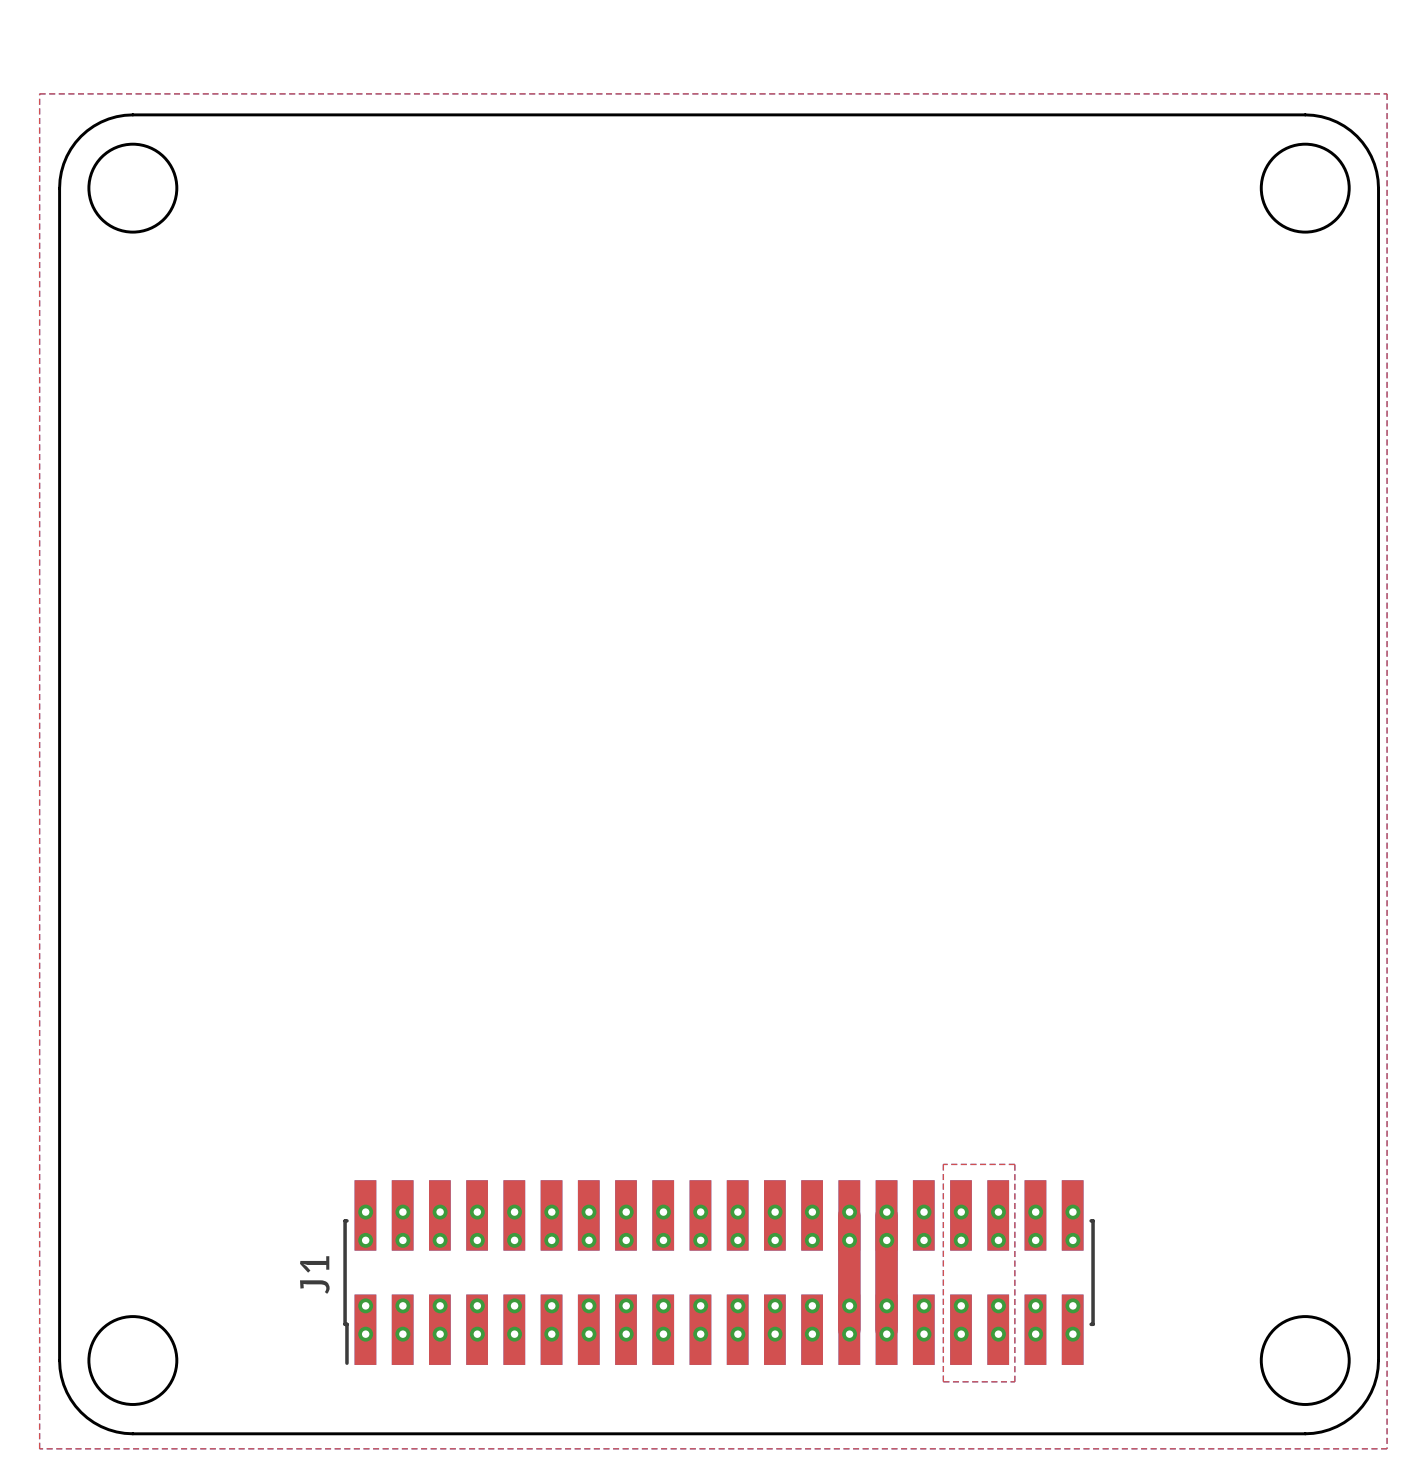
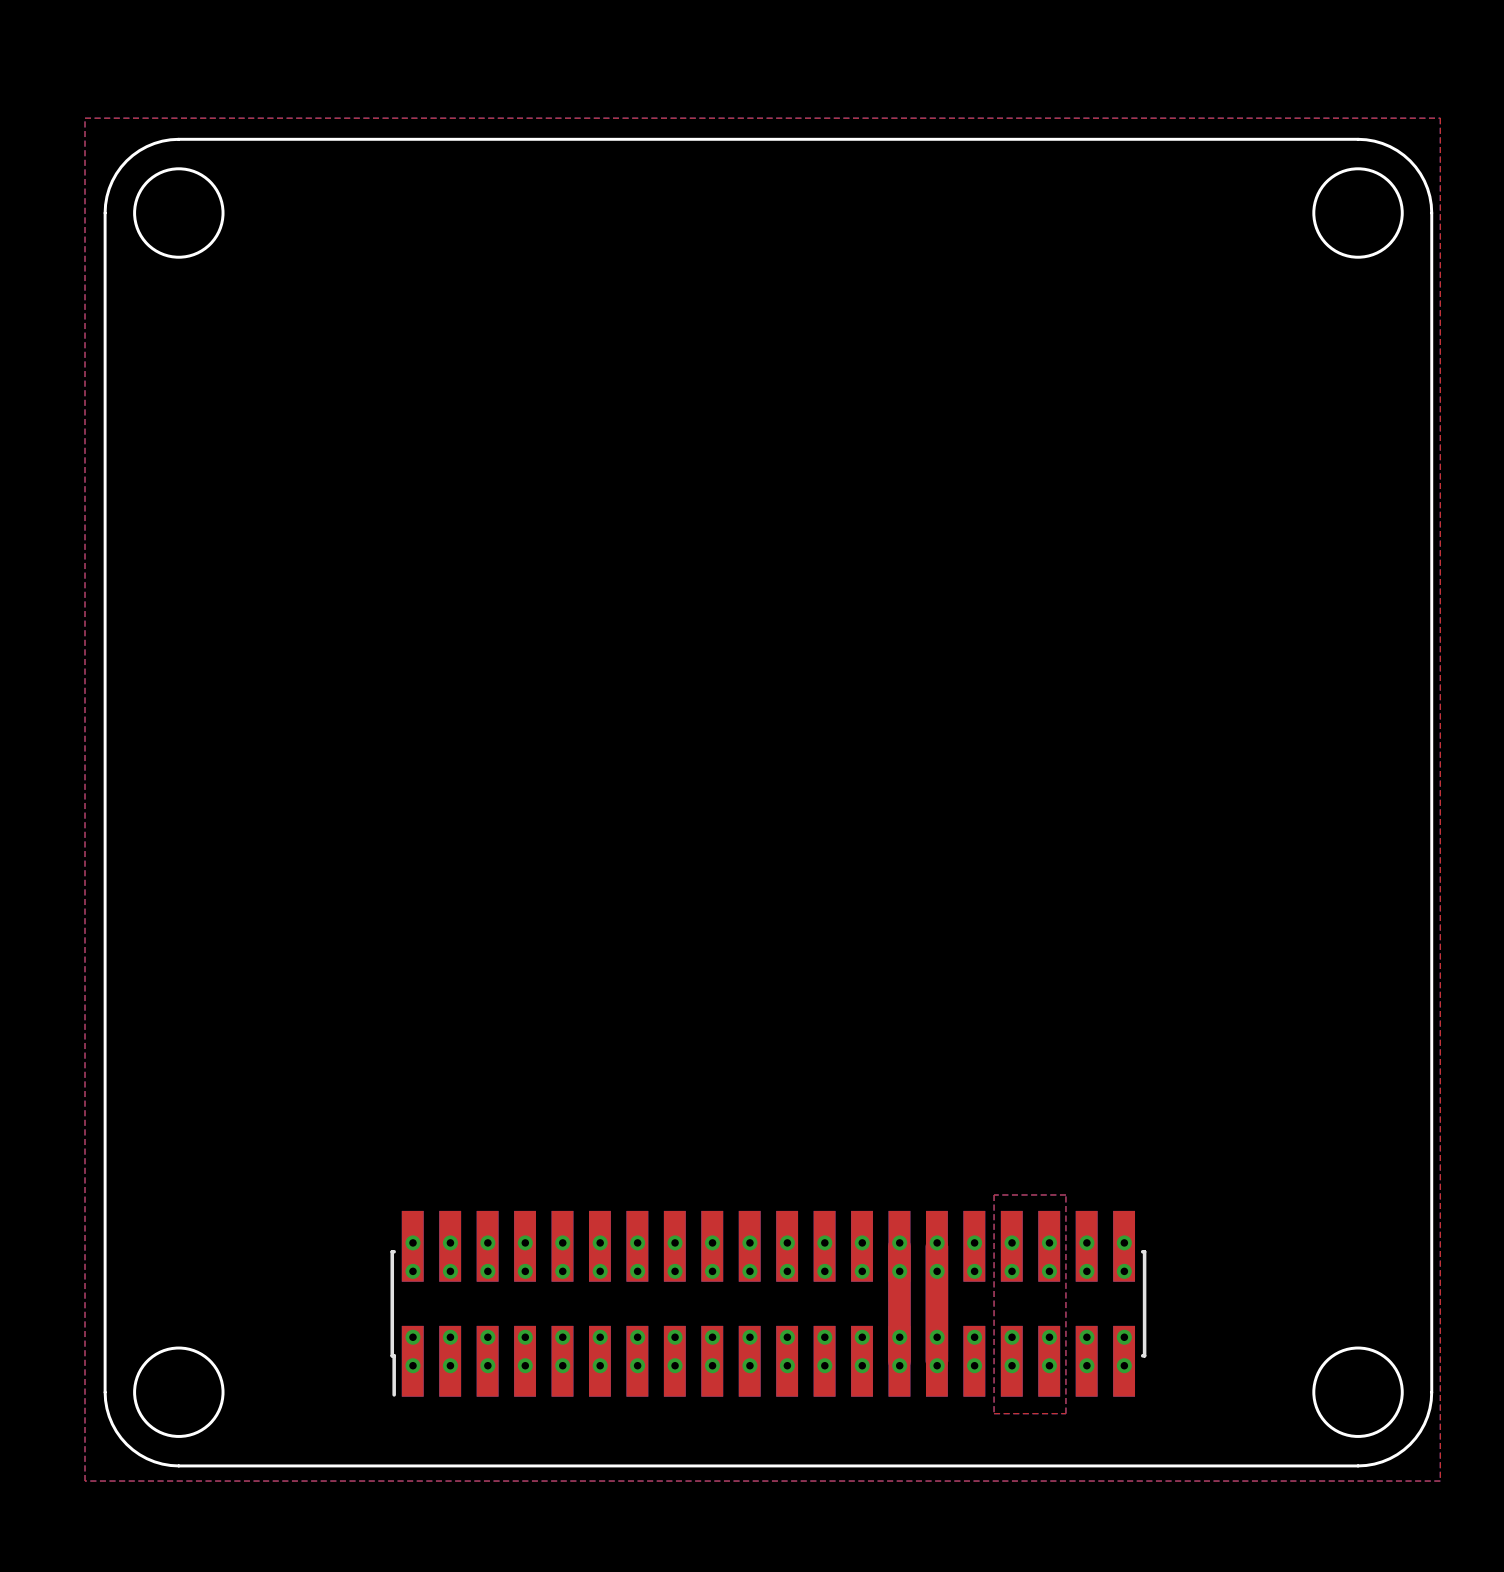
J1 name: J1 (314, 1275) -> none

